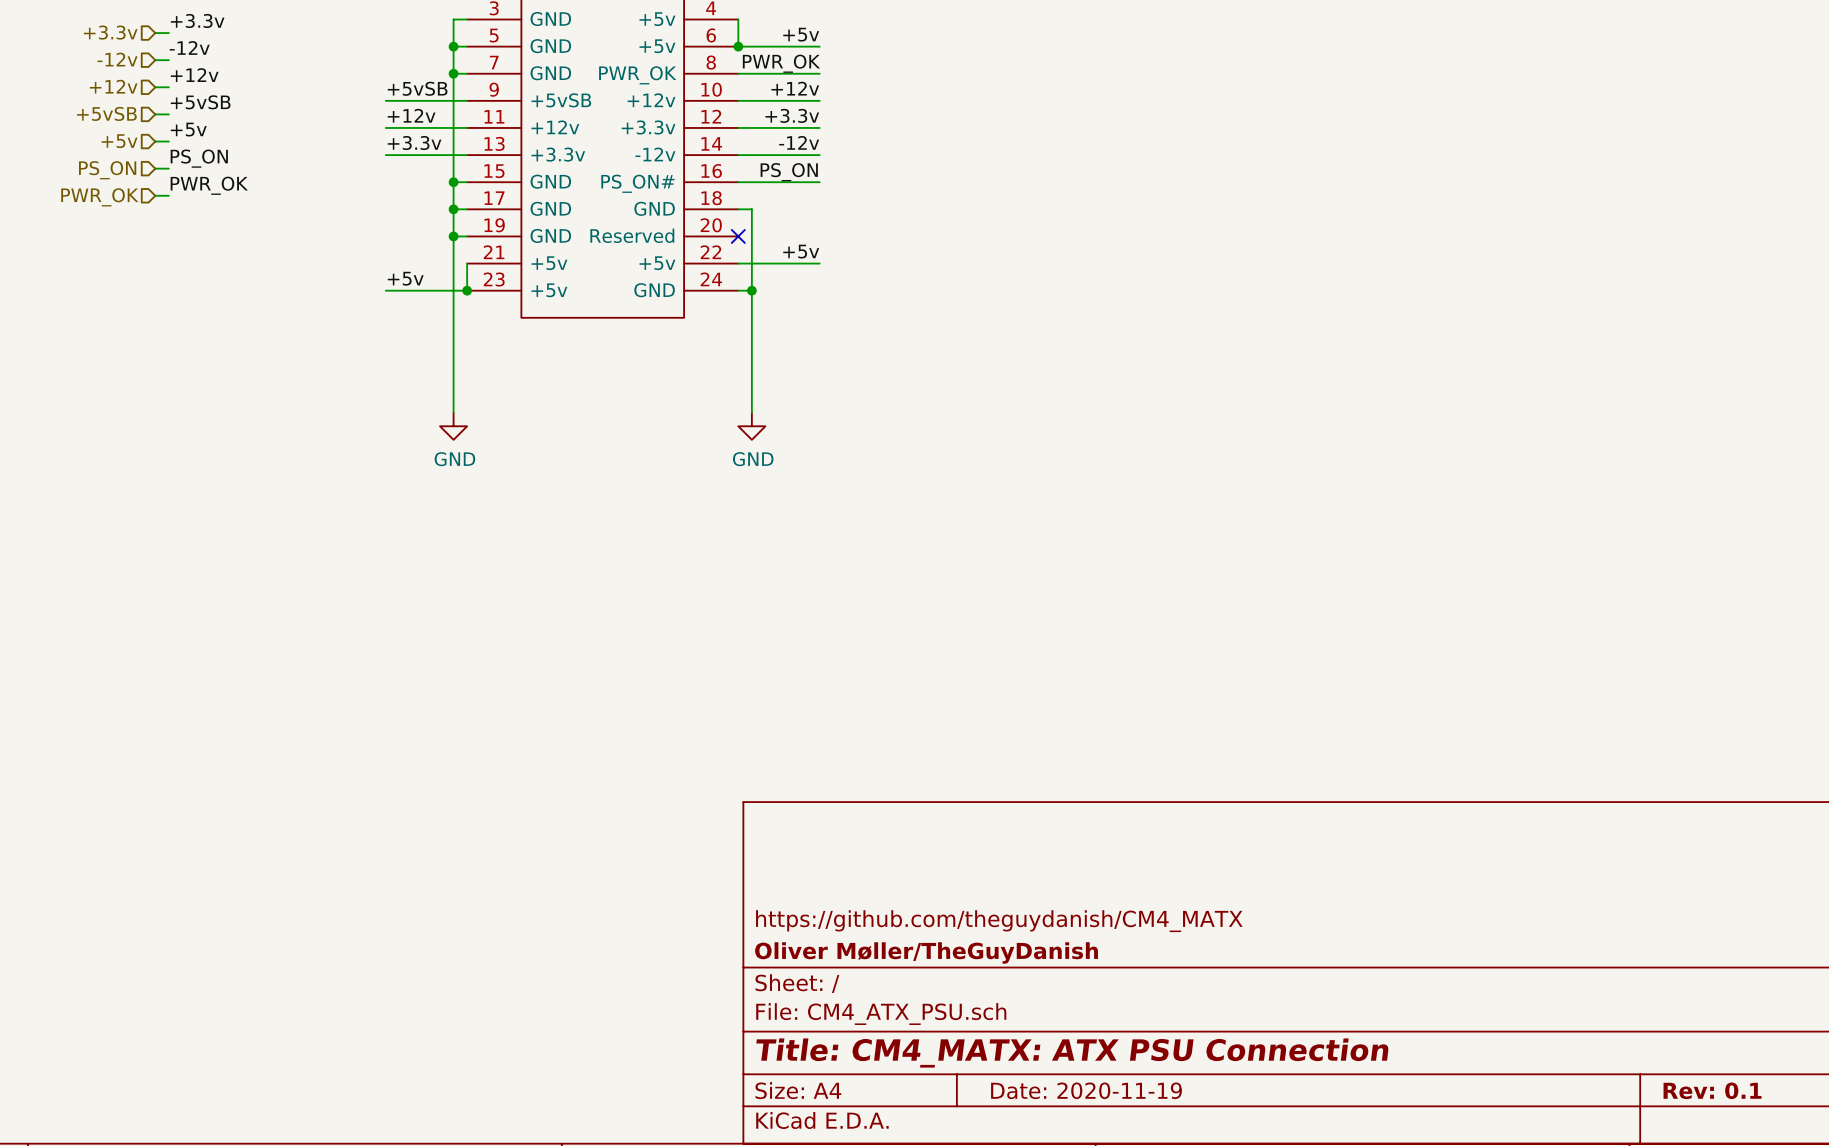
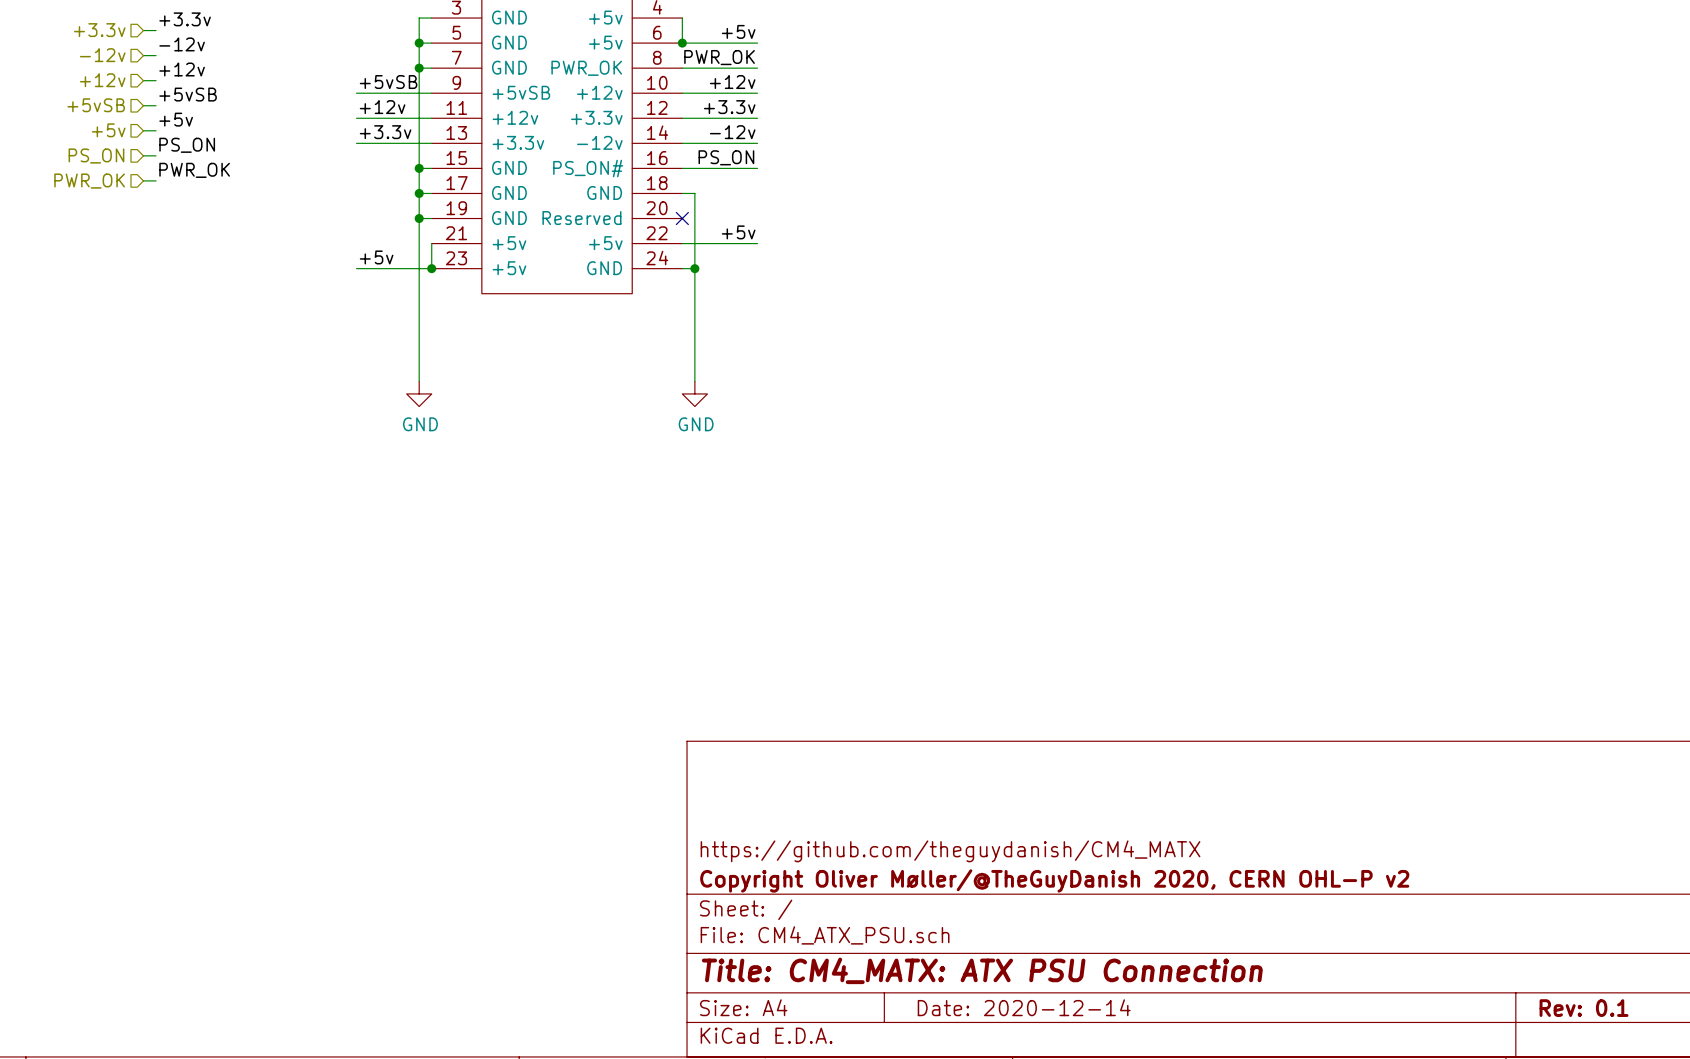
title block: Oliver Møller/TheGuyDanish (926, 952) -> Copyright Oliver Møller/@TheGuyDanish 2020, CERN OHL-P v2 (1054, 880)
title block: Date: 2020-11-19 (1086, 1090) -> Date: 2020-12-14 (1024, 1007)

